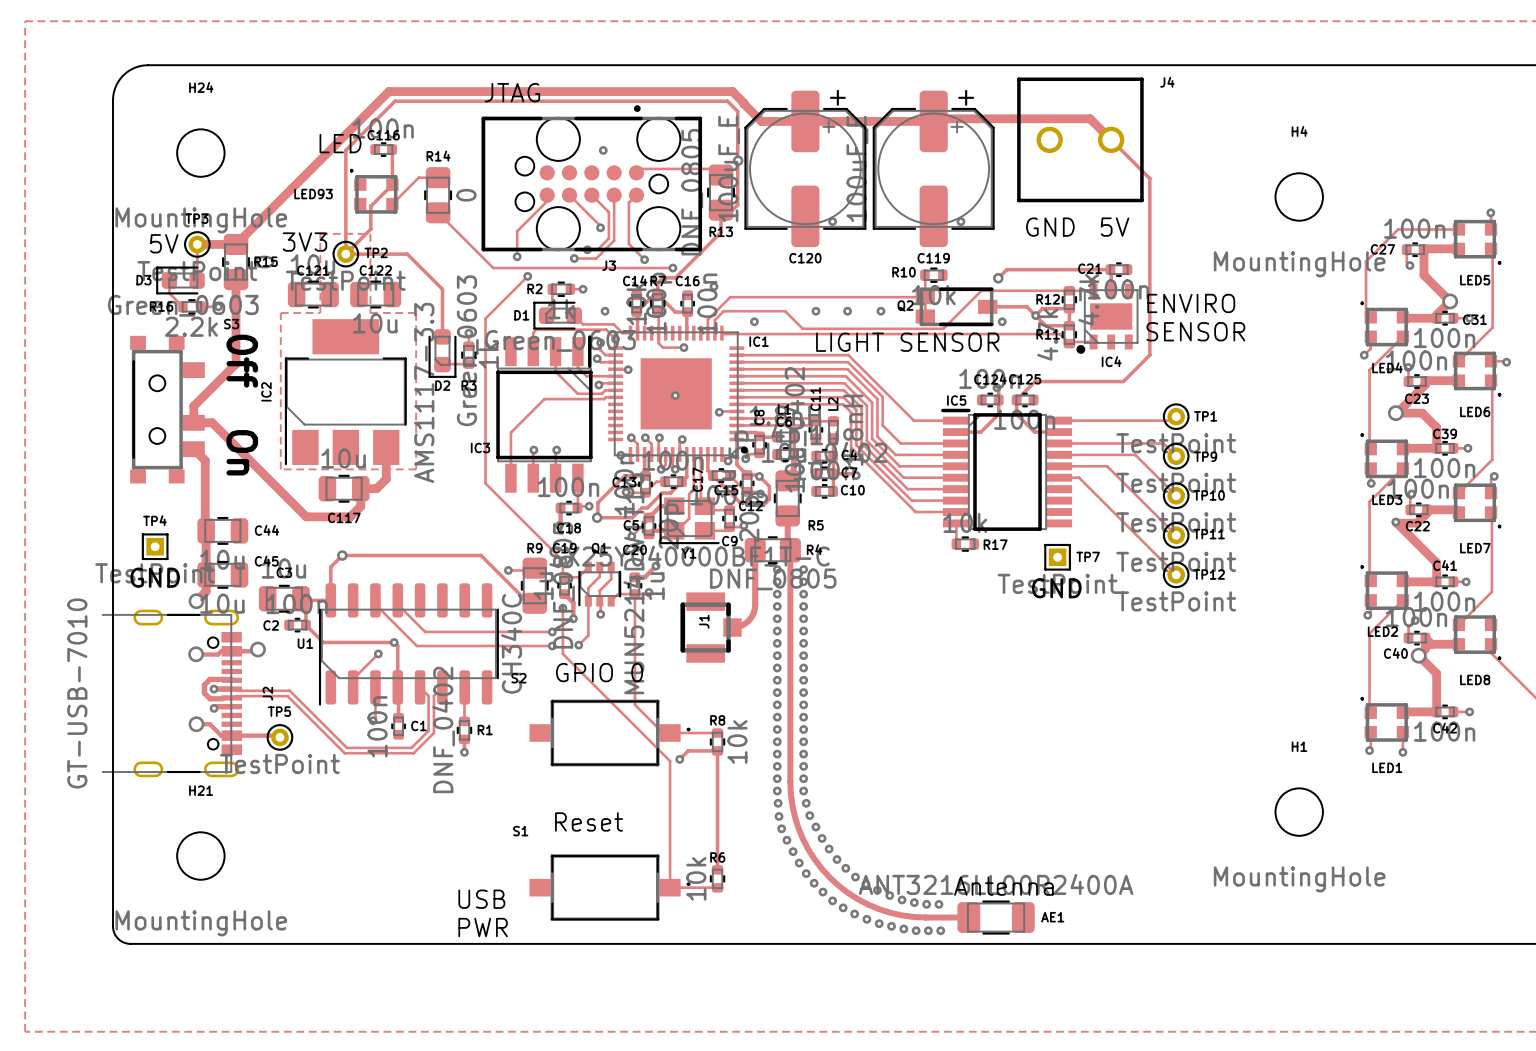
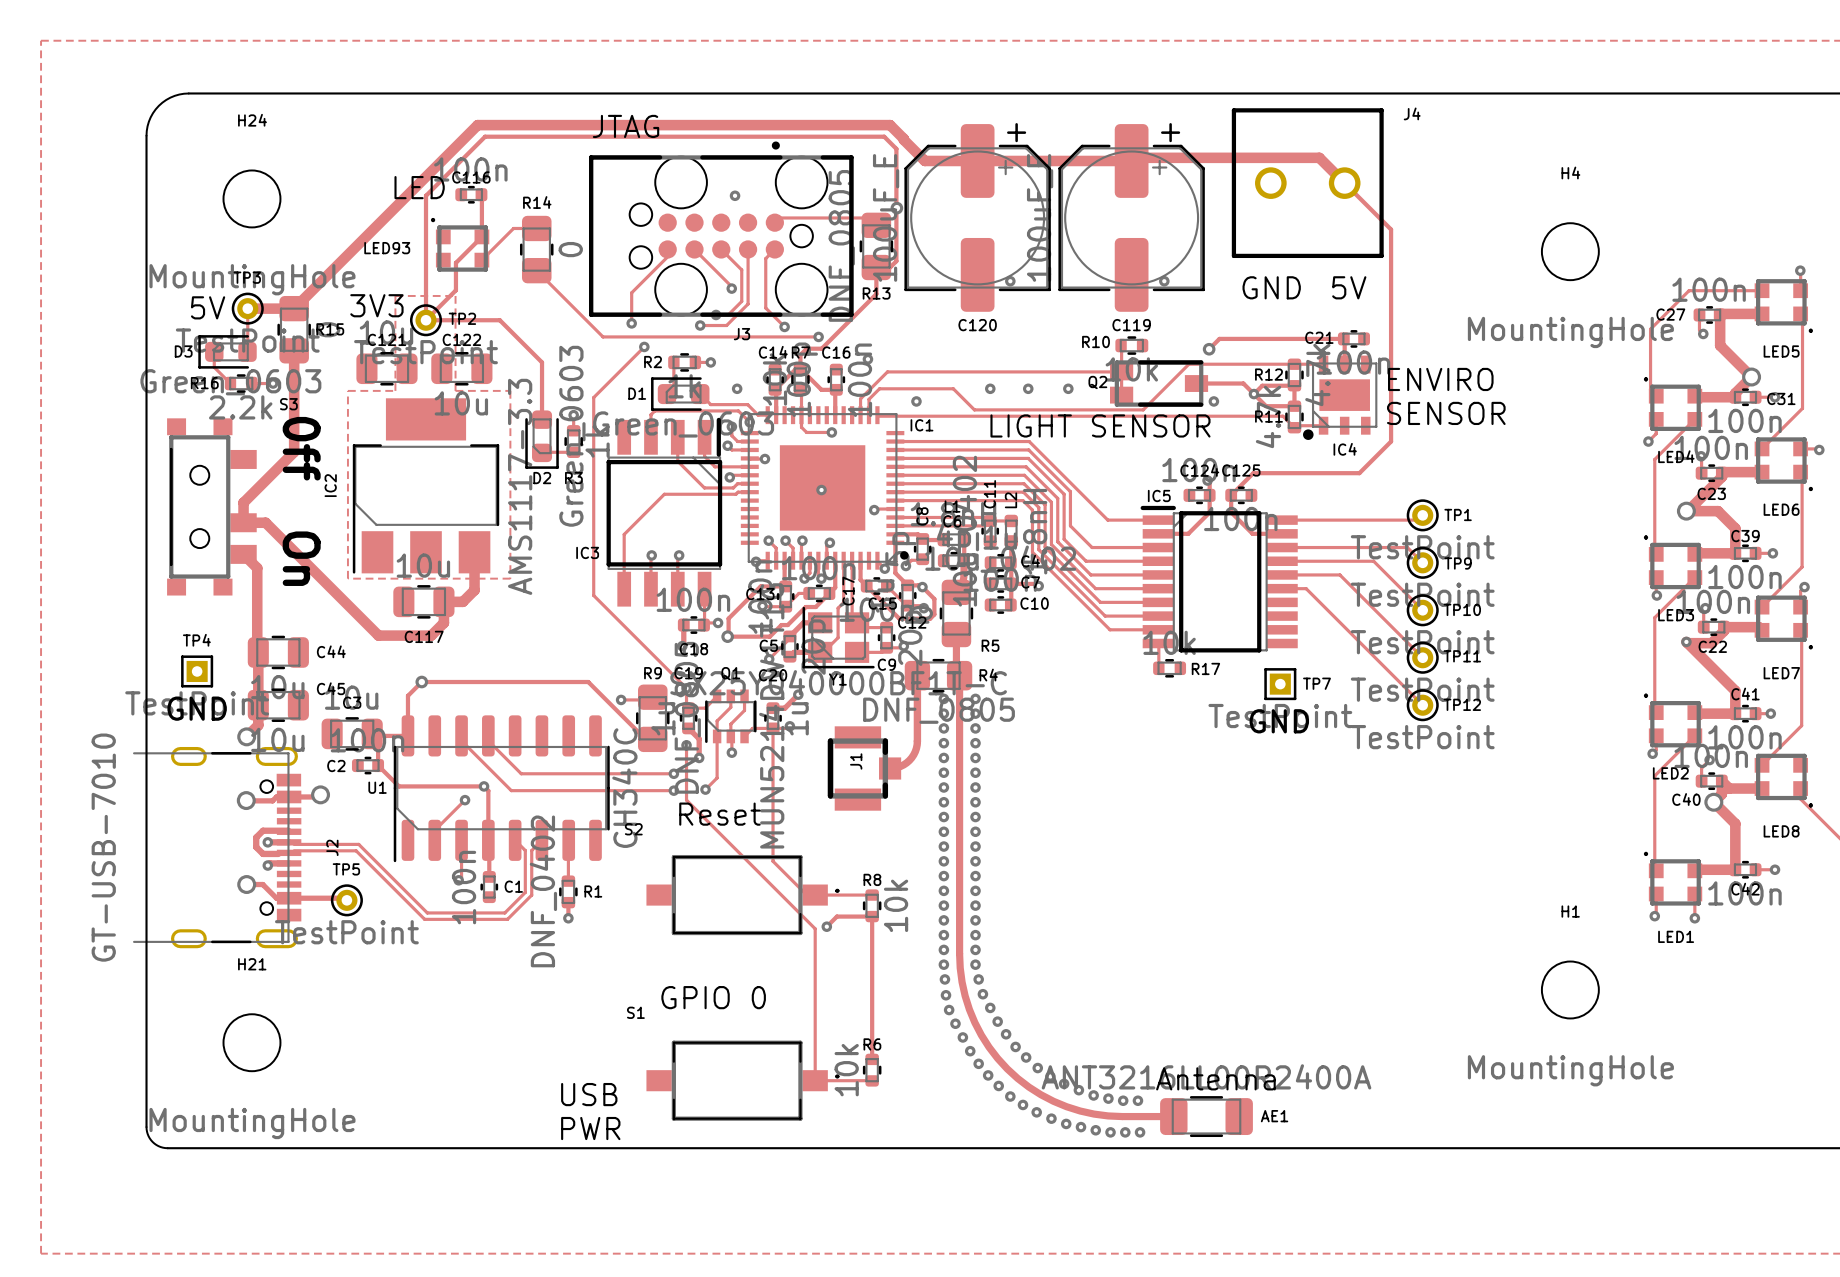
text position: GPIO 0 (599, 672) -> GPIO 0 (713, 997)
text position: Reset (588, 821) -> Reset (719, 814)

